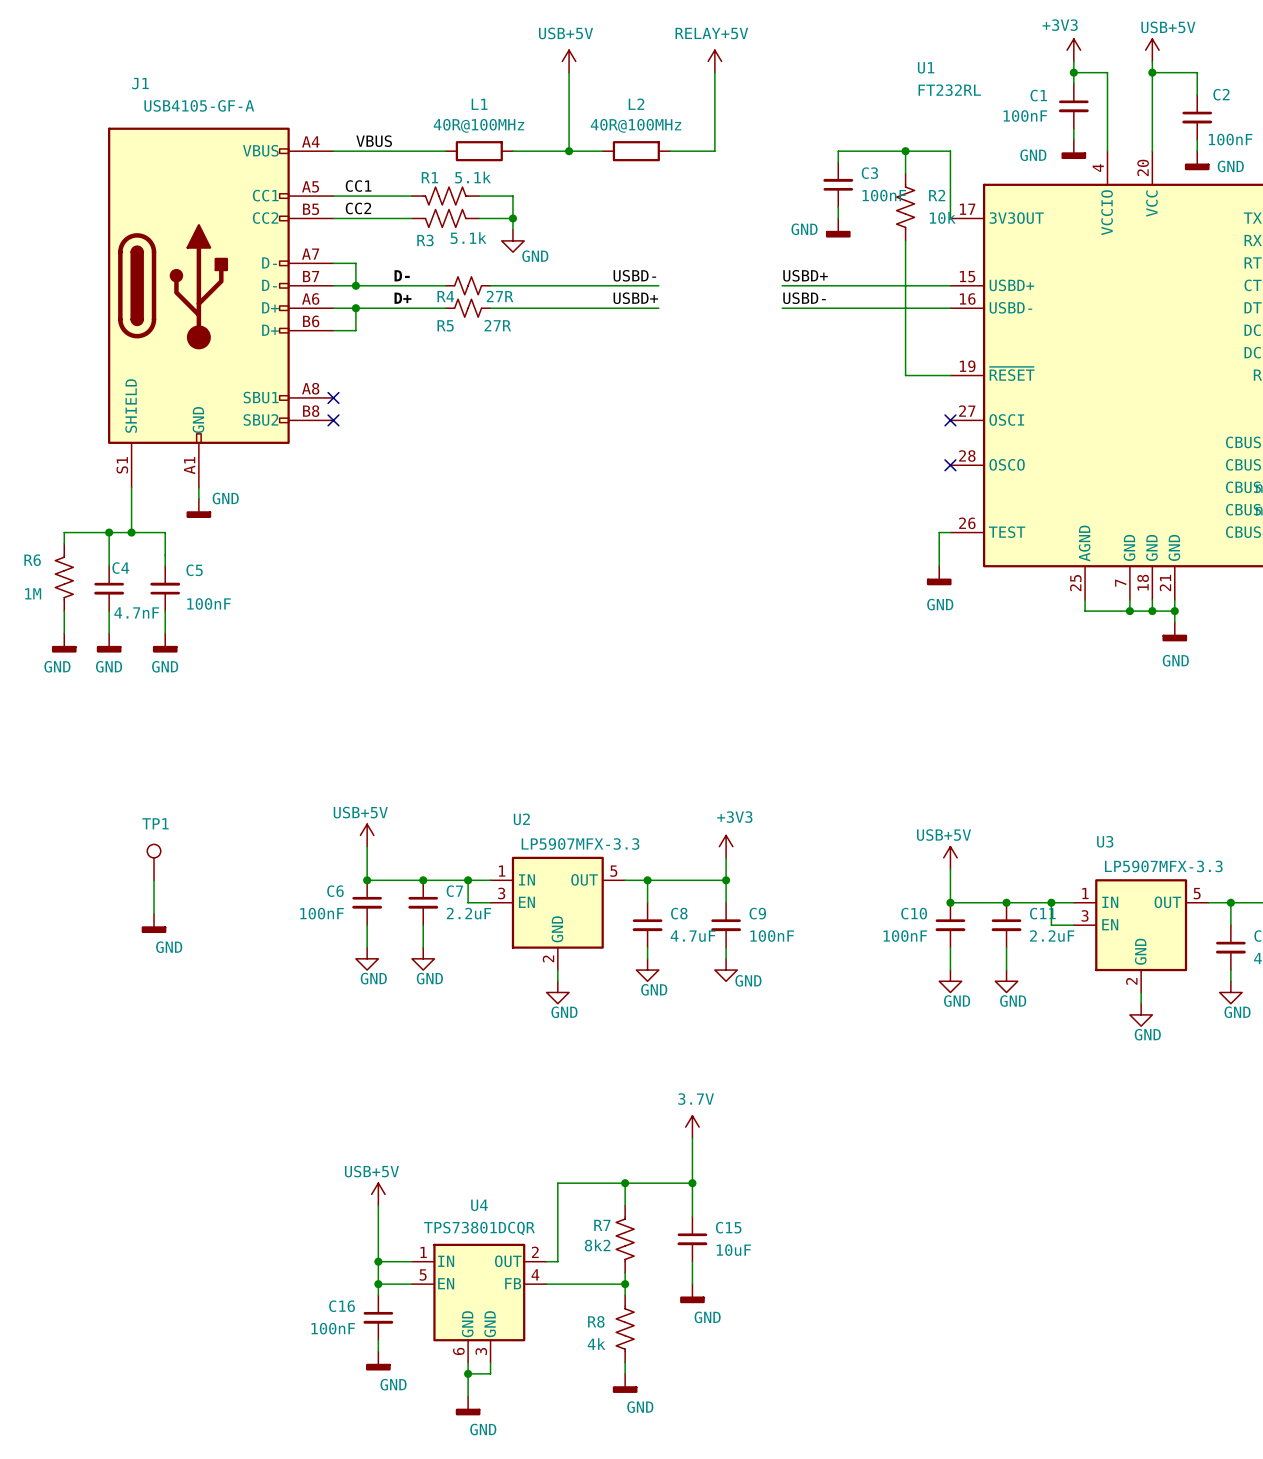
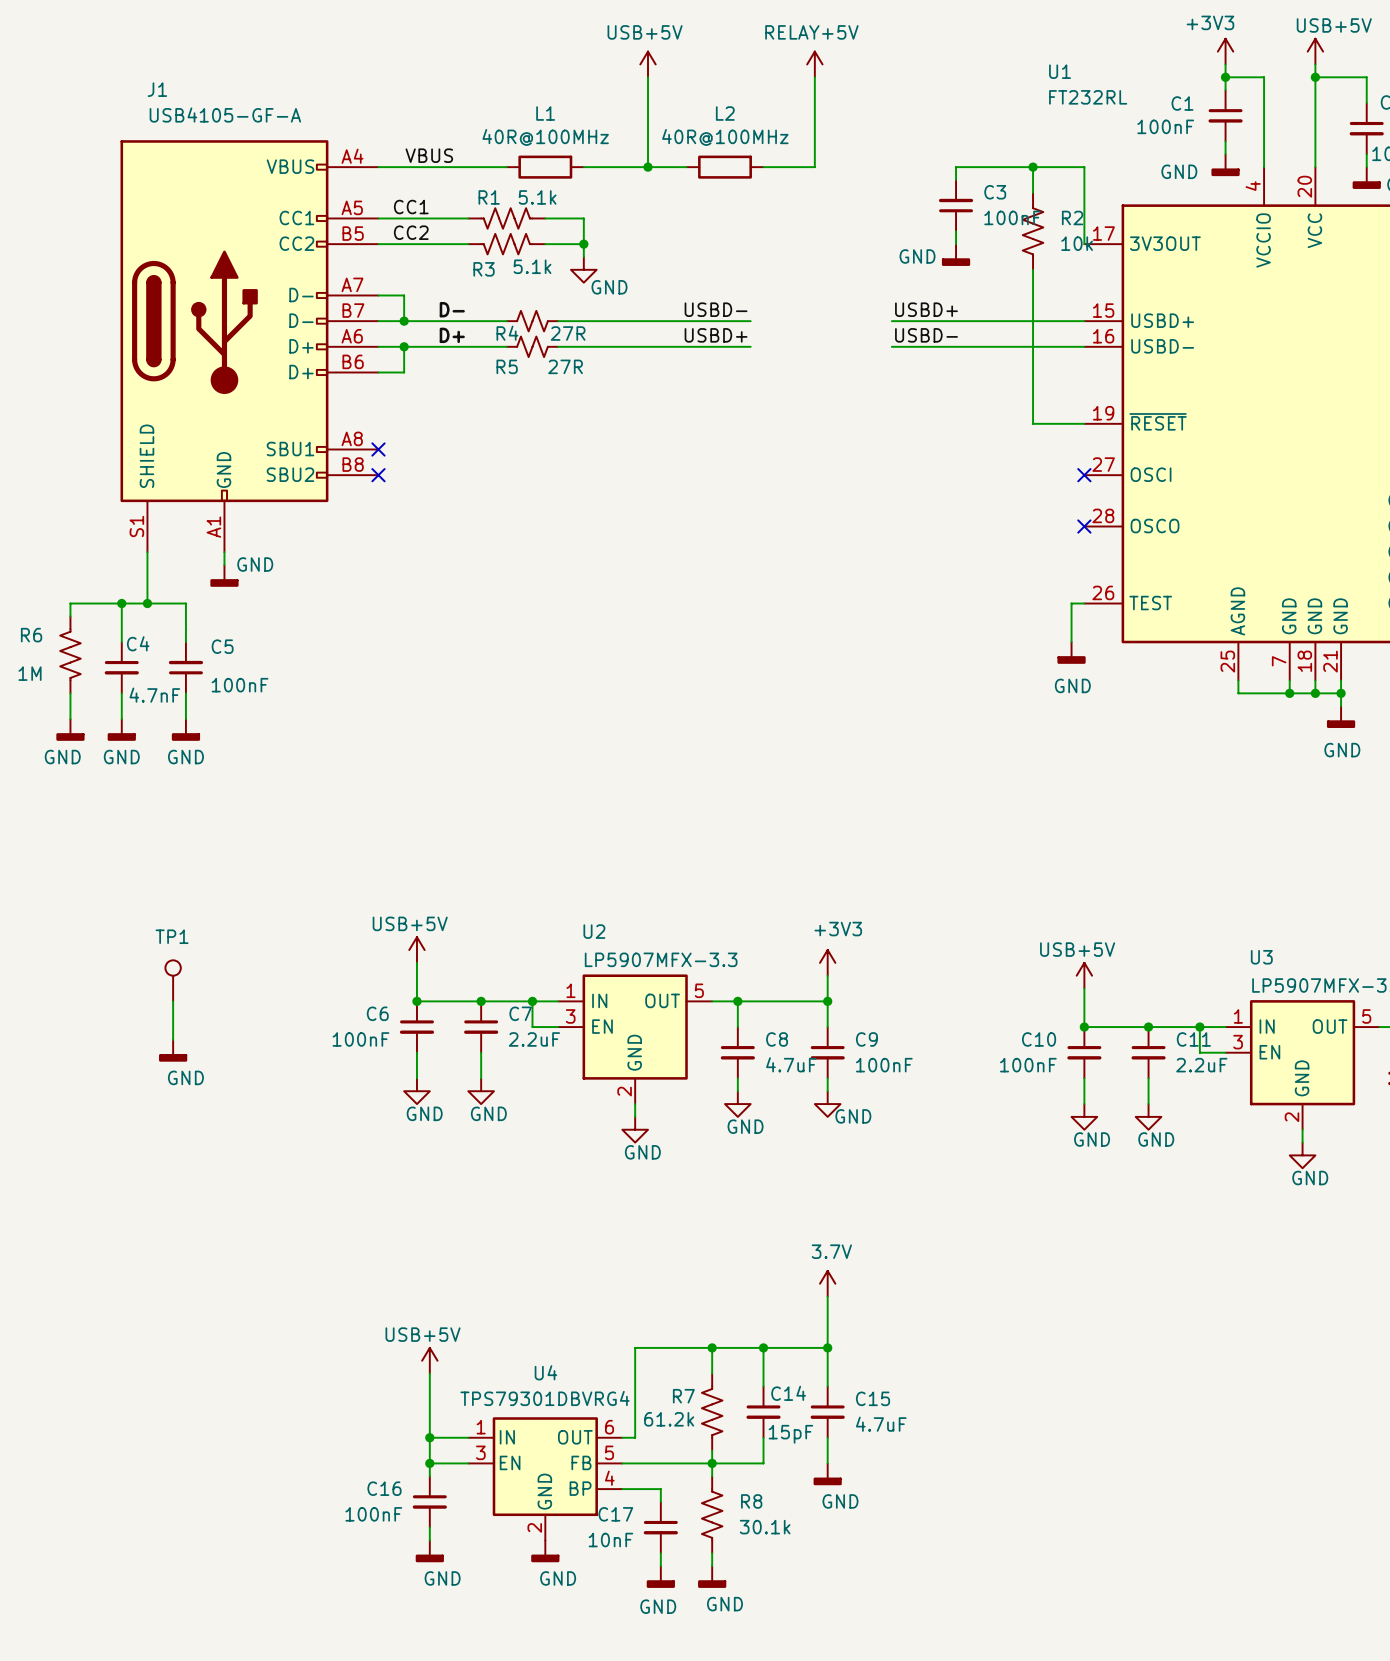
power symbol position: 3.7V (692, 1127) -> 3.7V (827, 1283)
wire: (692, 1138) (692, 1216) -> (827, 1296) (827, 1386)
wire: none -> (763, 1347) (763, 1386)
junction: none -> (763, 1347)
wire: none -> (789, 1347) (827, 1347)
junction: (692, 1183) -> none
junction: none -> (827, 1347)
U4 value: TPS73801DCQR (479, 1228) -> TPS79301DBVRG4 (545, 1398)
C14: none -> 15pF (763, 1412)
C15 position: (692, 1239) -> (827, 1412)
U4 symbol: [412, 1243, 547, 1363] -> [468, 1417, 623, 1541]
R7 value: 8k2 (597, 1245) -> 61.2k (669, 1419)
C15 value: 10uF (733, 1250) -> 4.7uF (881, 1424)
wire: none -> (763, 1437) (763, 1463) (712, 1463)
wire: (692, 1261) (692, 1284) -> (827, 1437) (827, 1463)
power symbol position: GND (692, 1293) -> GND (827, 1474)
wire: none -> (622, 1489) (660, 1489) (660, 1501)
R8 name position: R8 (596, 1321) -> R8 (751, 1501)
C17: none -> 10nF (660, 1527)
R8 value: 4k (596, 1344) -> 30.1k (765, 1527)
wire: (468, 1362) (468, 1396) -> none
wire: (490, 1362) (490, 1373) (468, 1373) -> none
wire: none -> (660, 1553) (660, 1566)
junction: (468, 1373) -> none
power symbol: none -> GND (660, 1577)
power symbol position: GND (468, 1405) -> GND (545, 1551)

